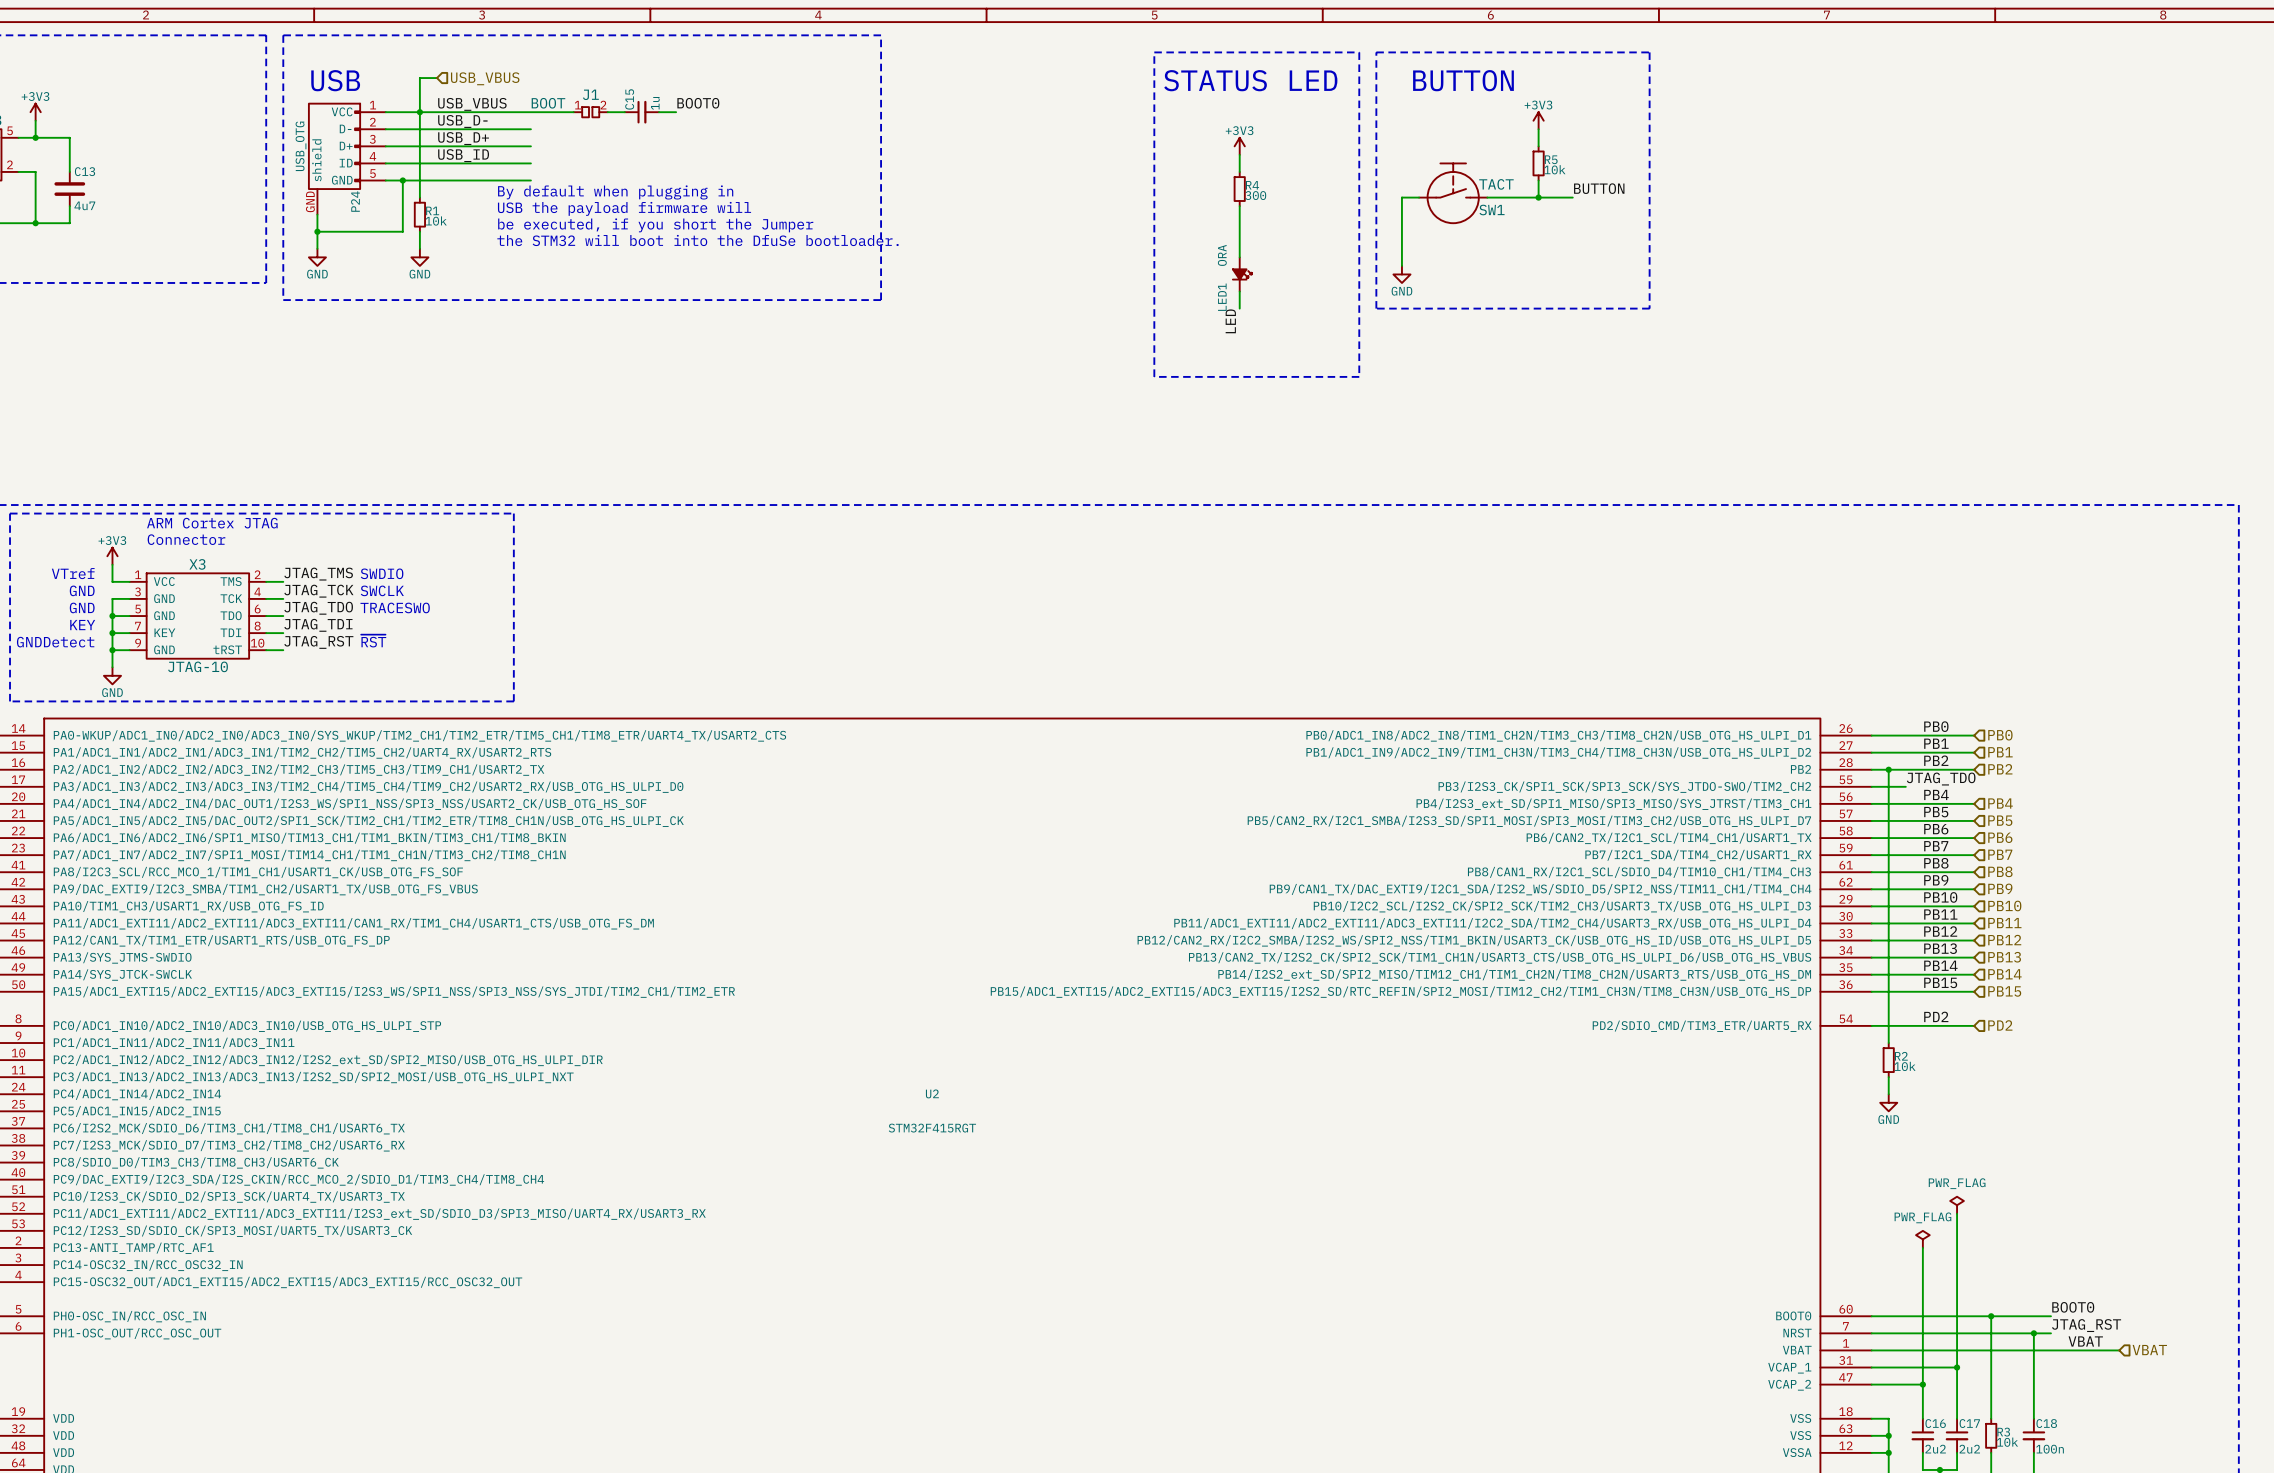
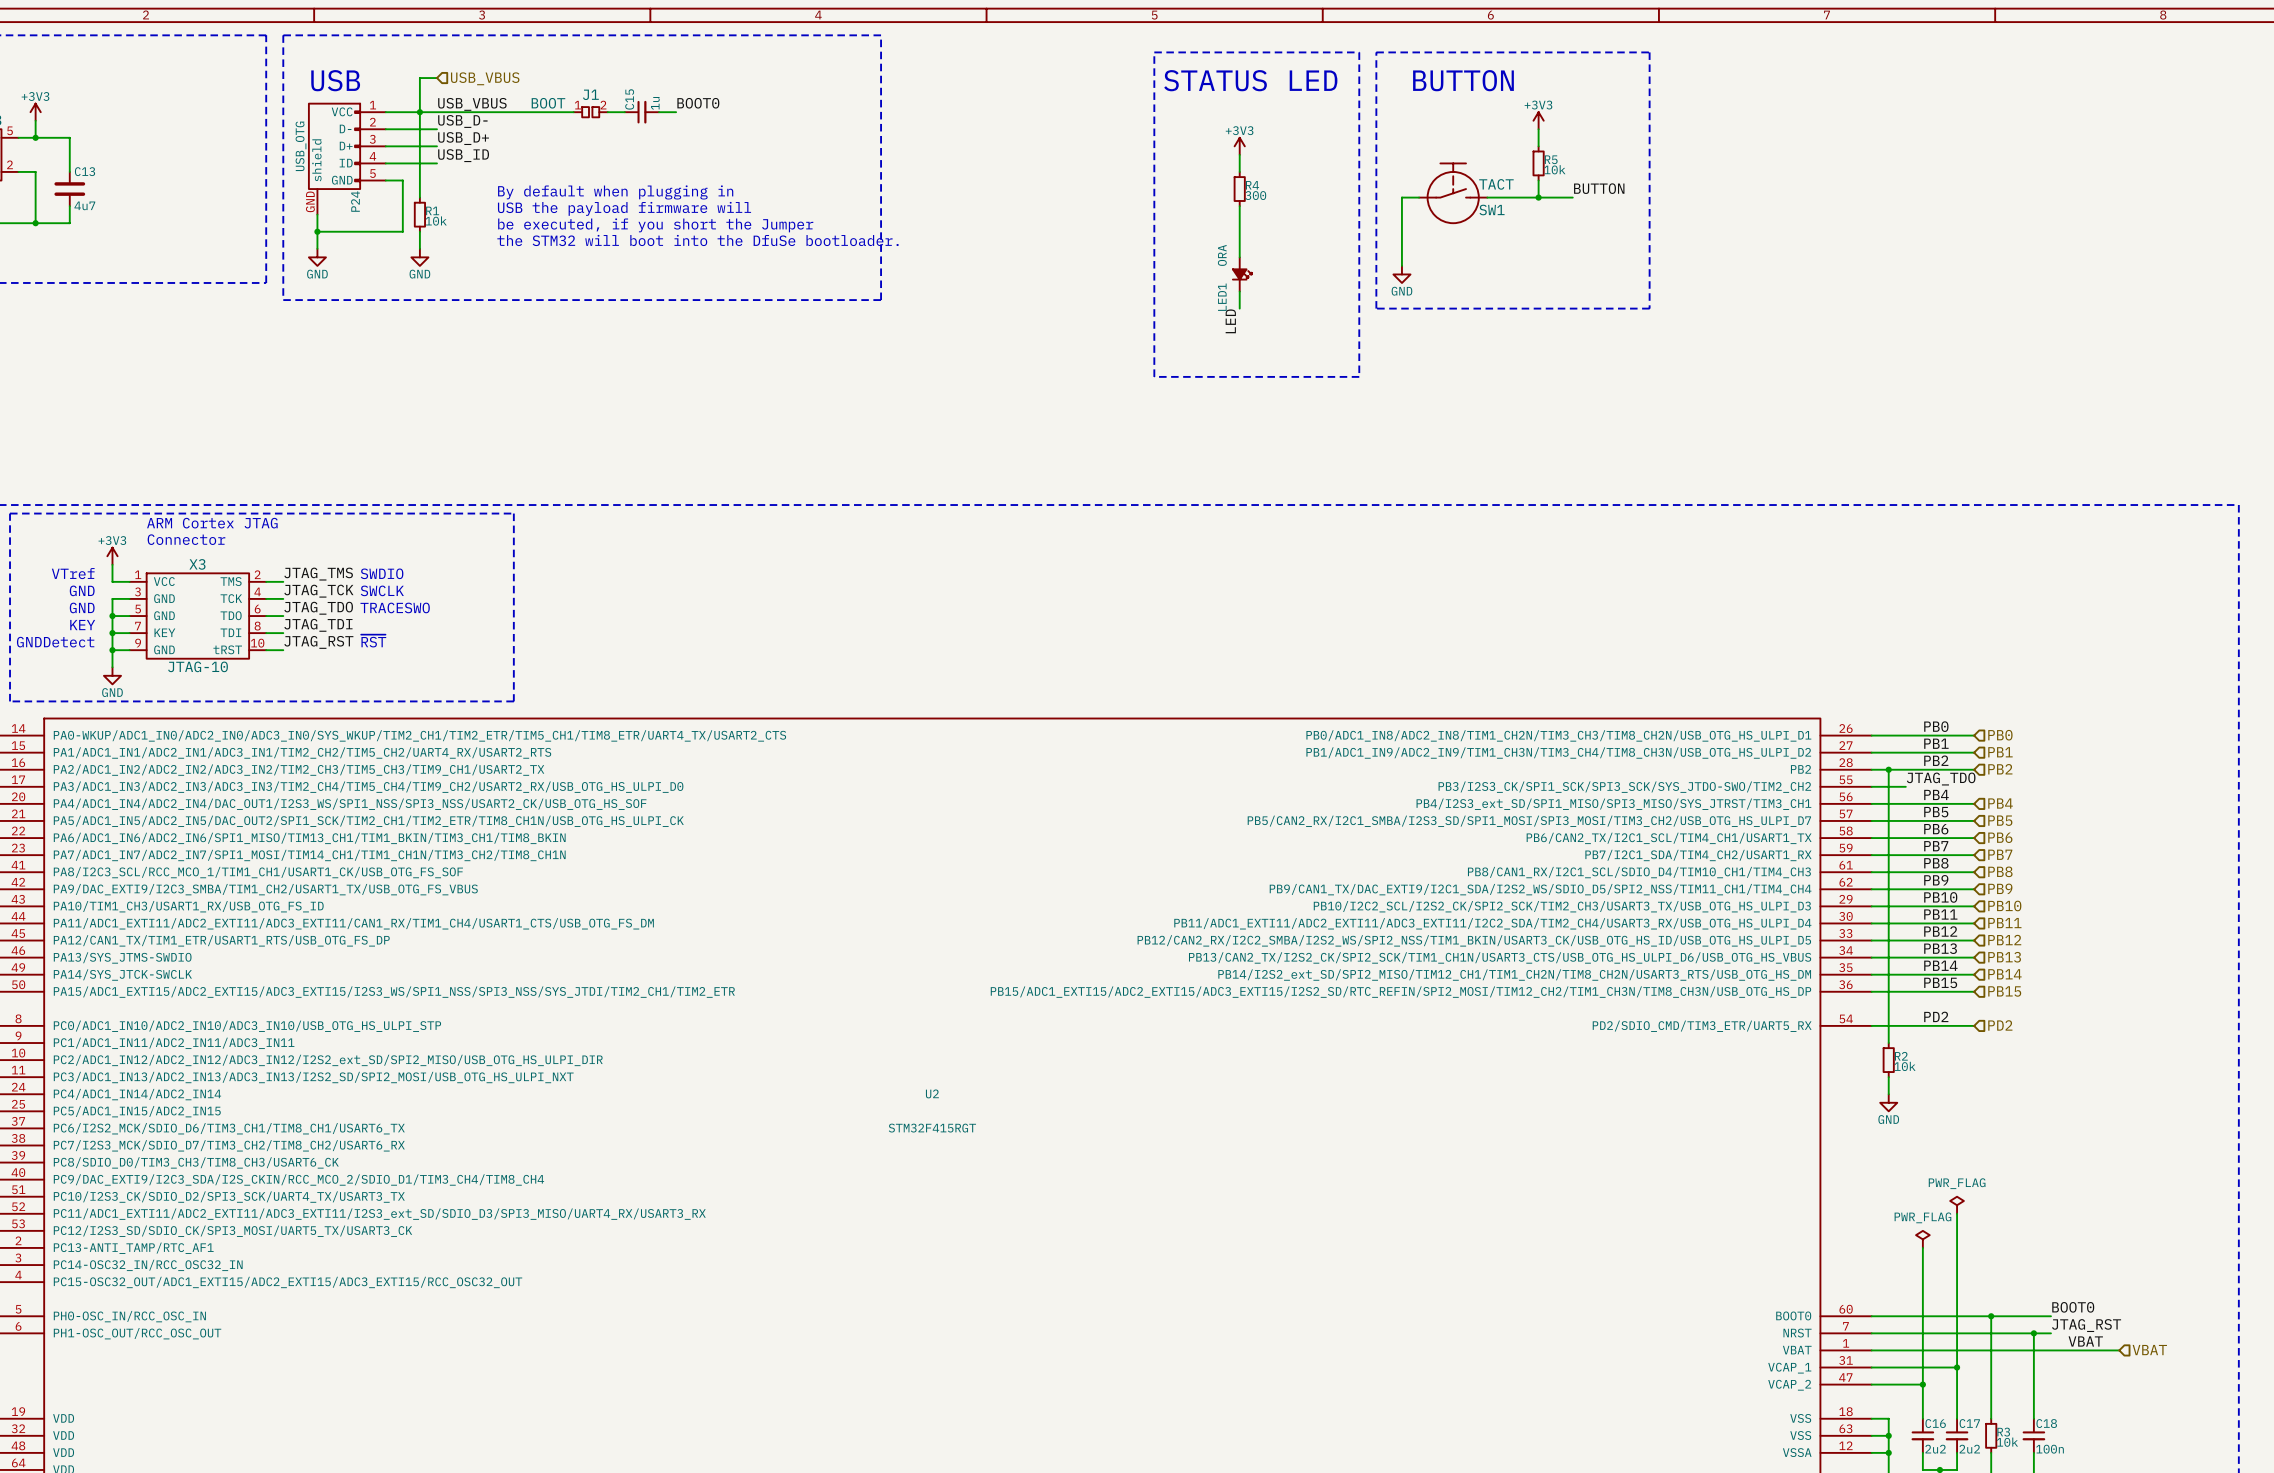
wire: (436, 129) (530, 129) -> none
wire: (436, 146) (530, 146) -> none
wire: (436, 163) (530, 163) -> none
wire: (402, 180) (530, 180) -> none
junction: (402, 180) -> none

